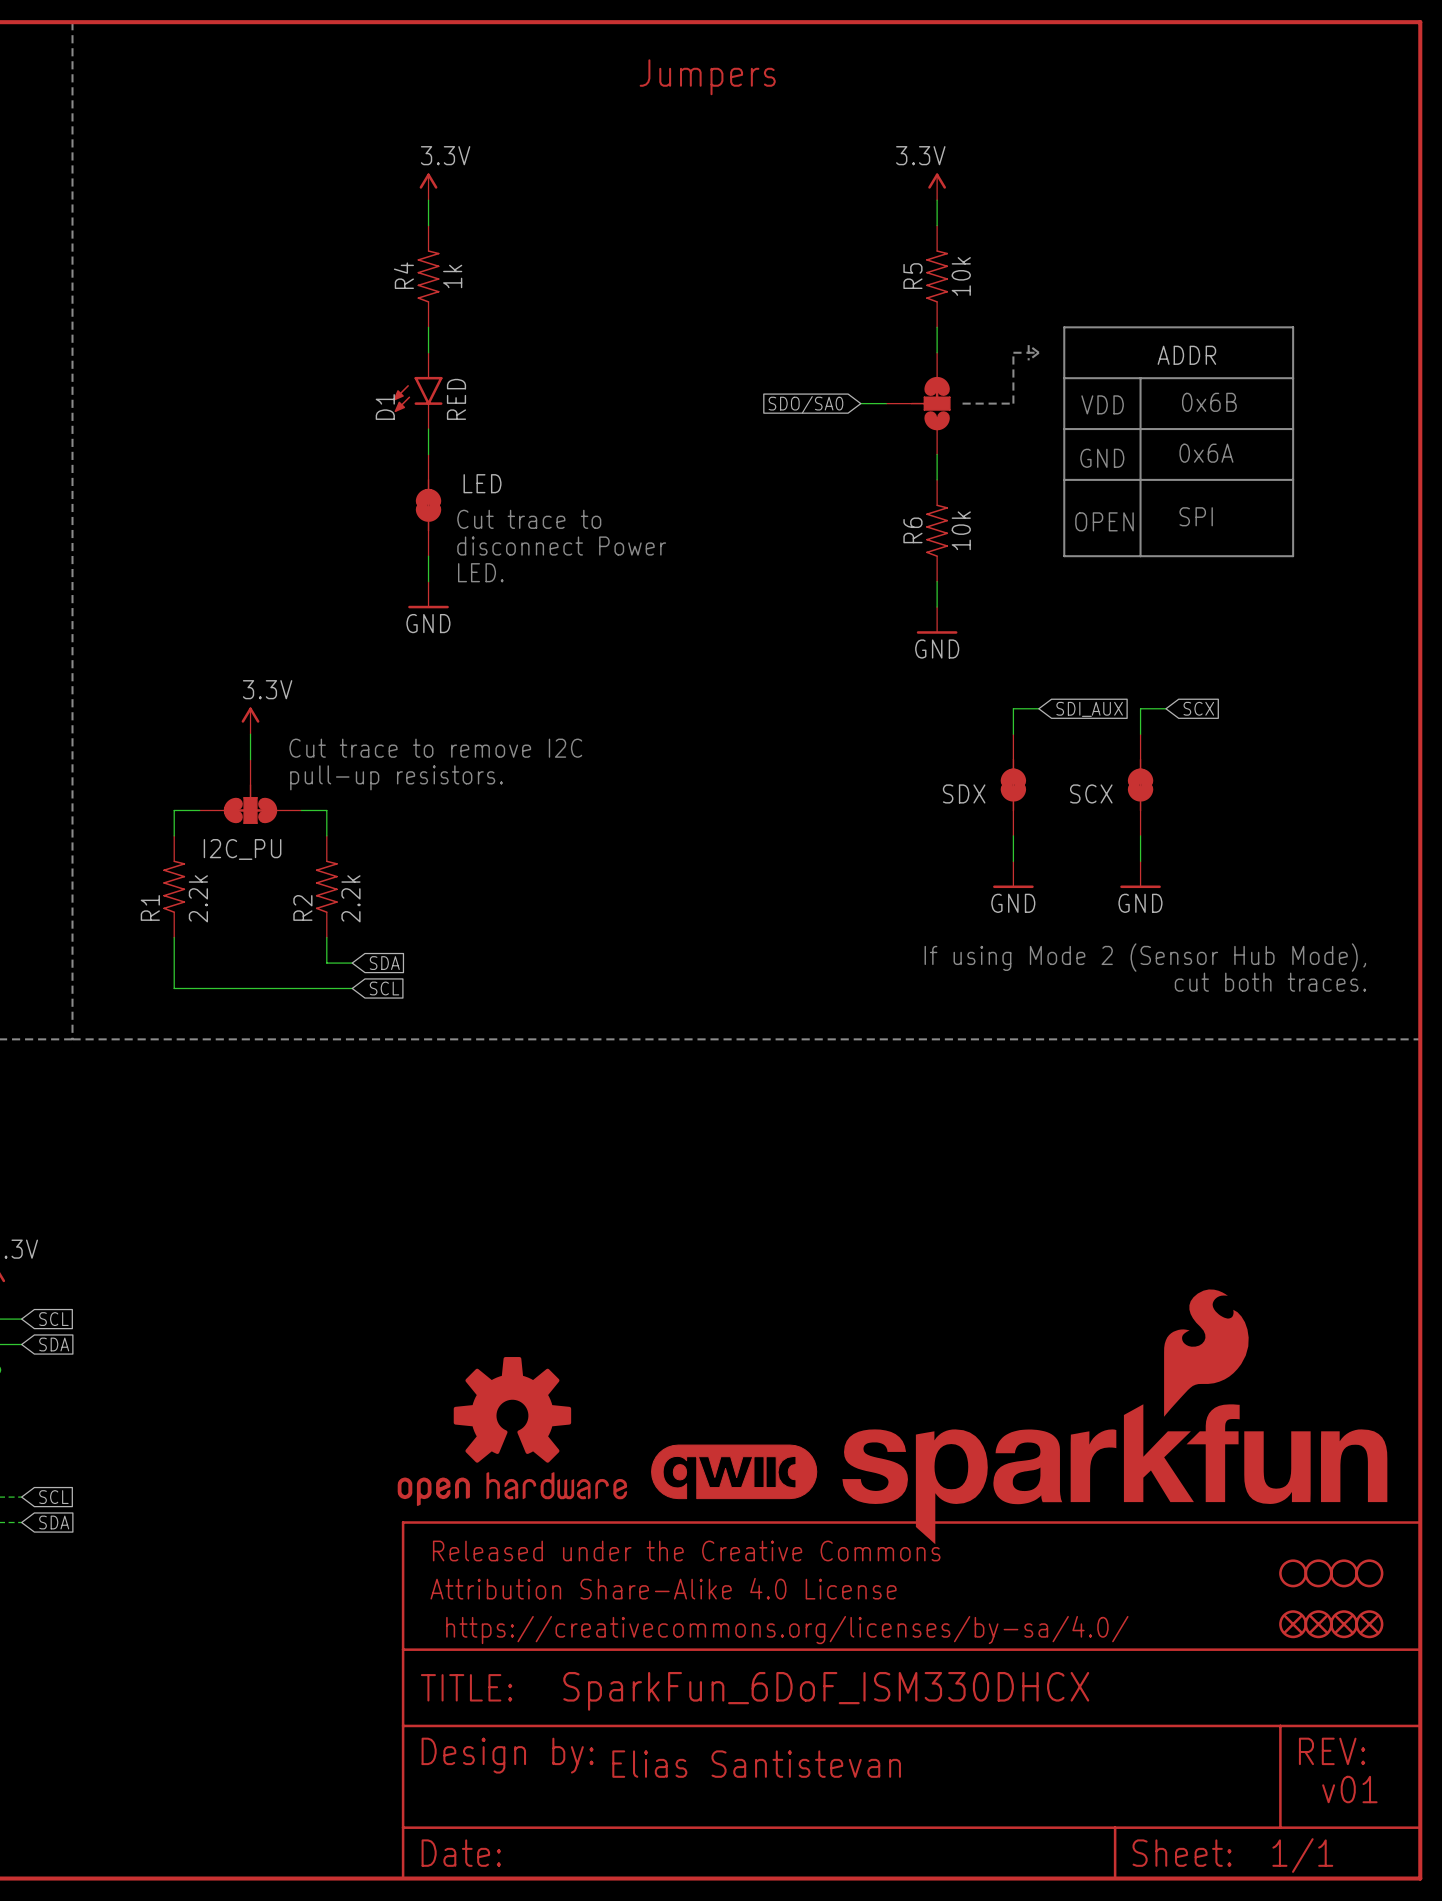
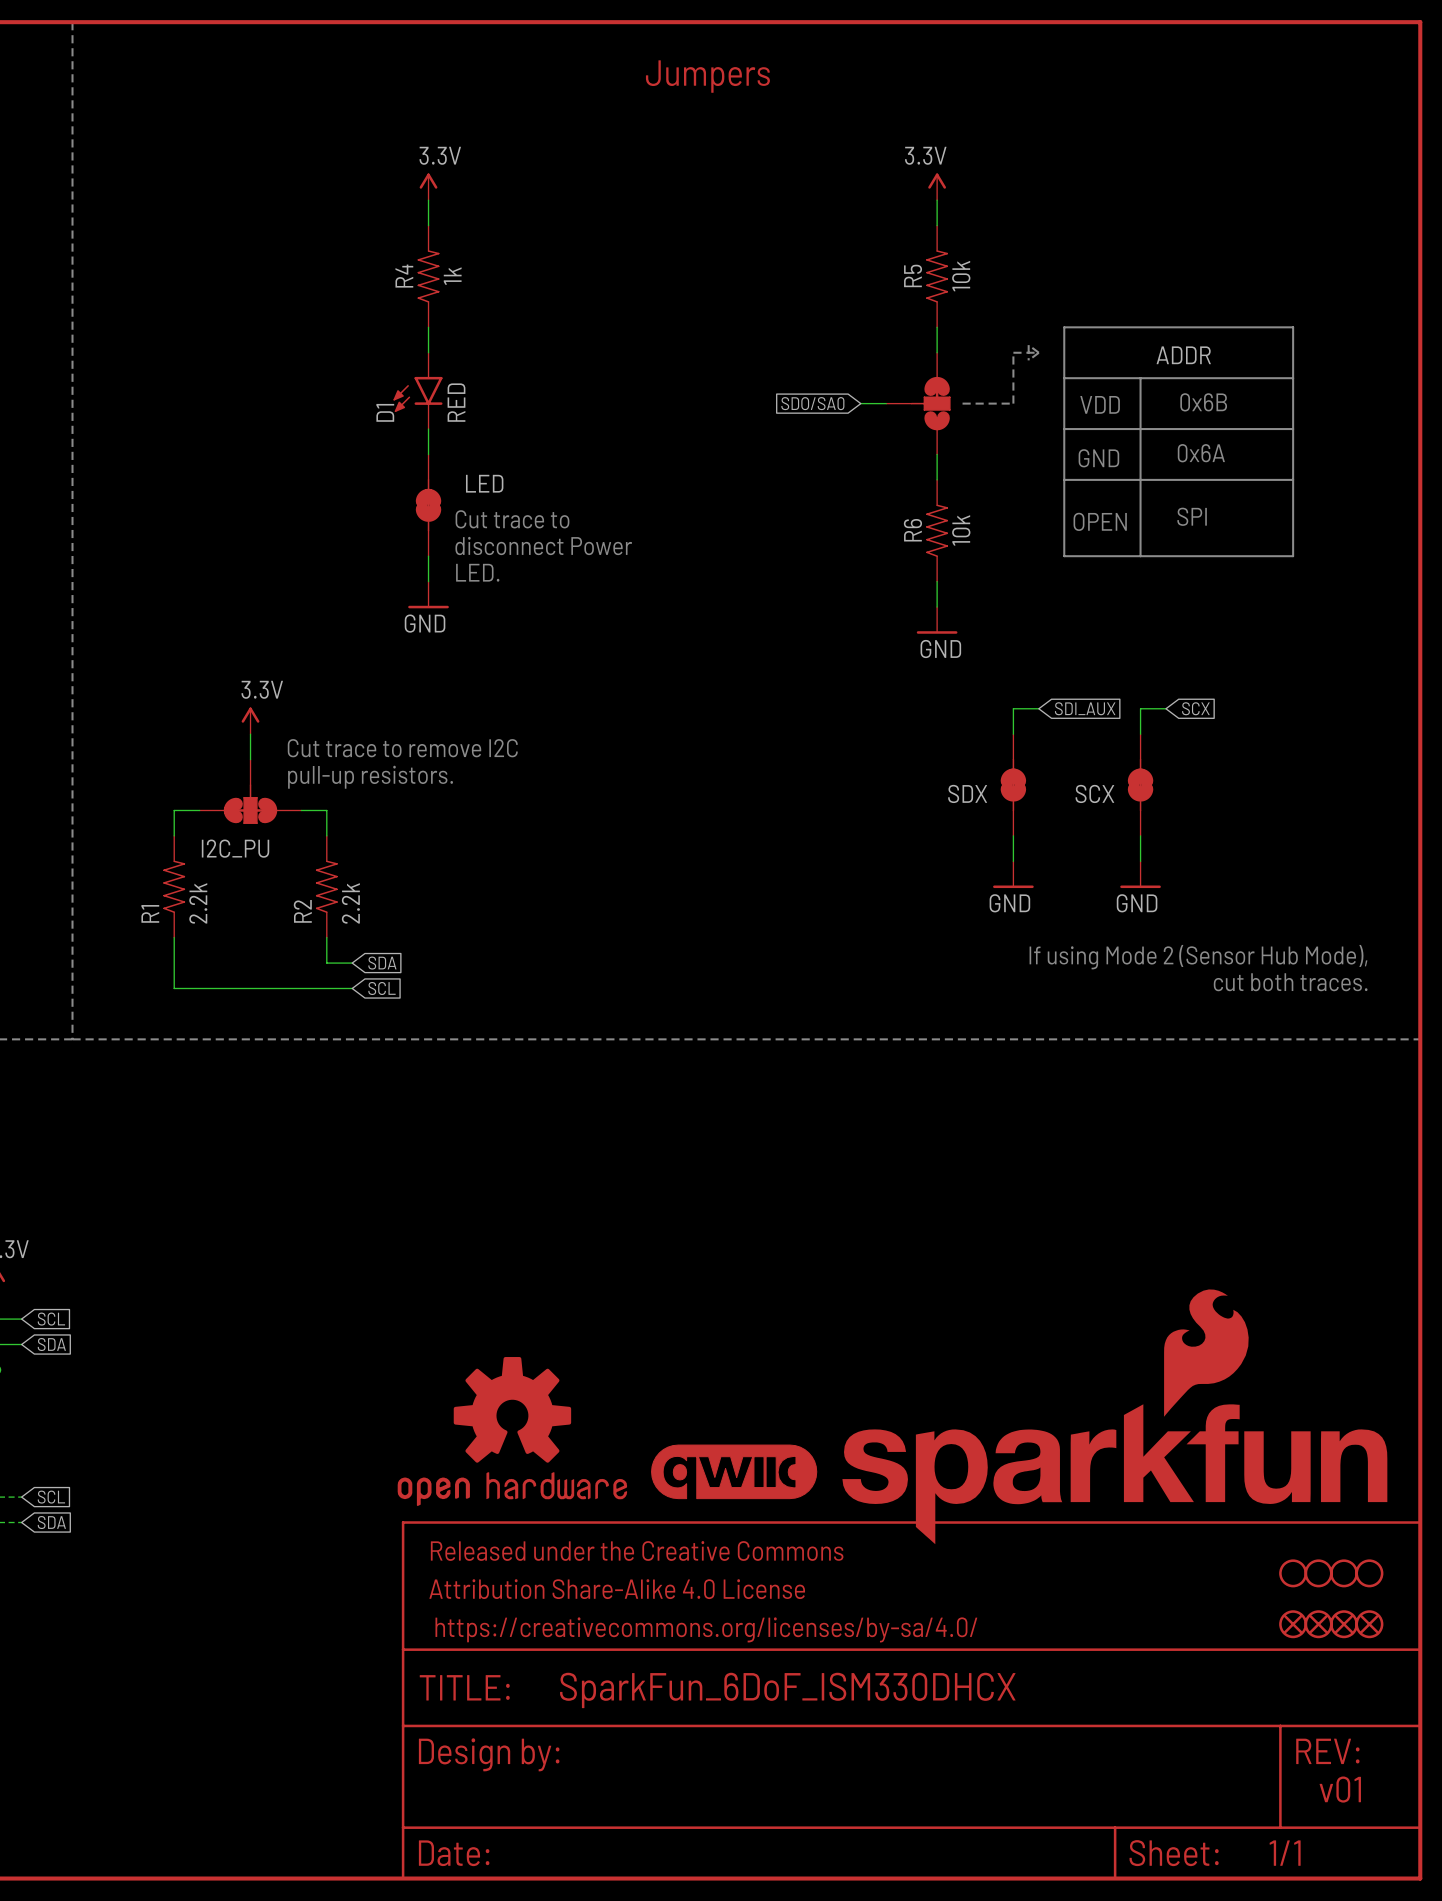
text: Elias Santistevan (756, 1764) -> none

